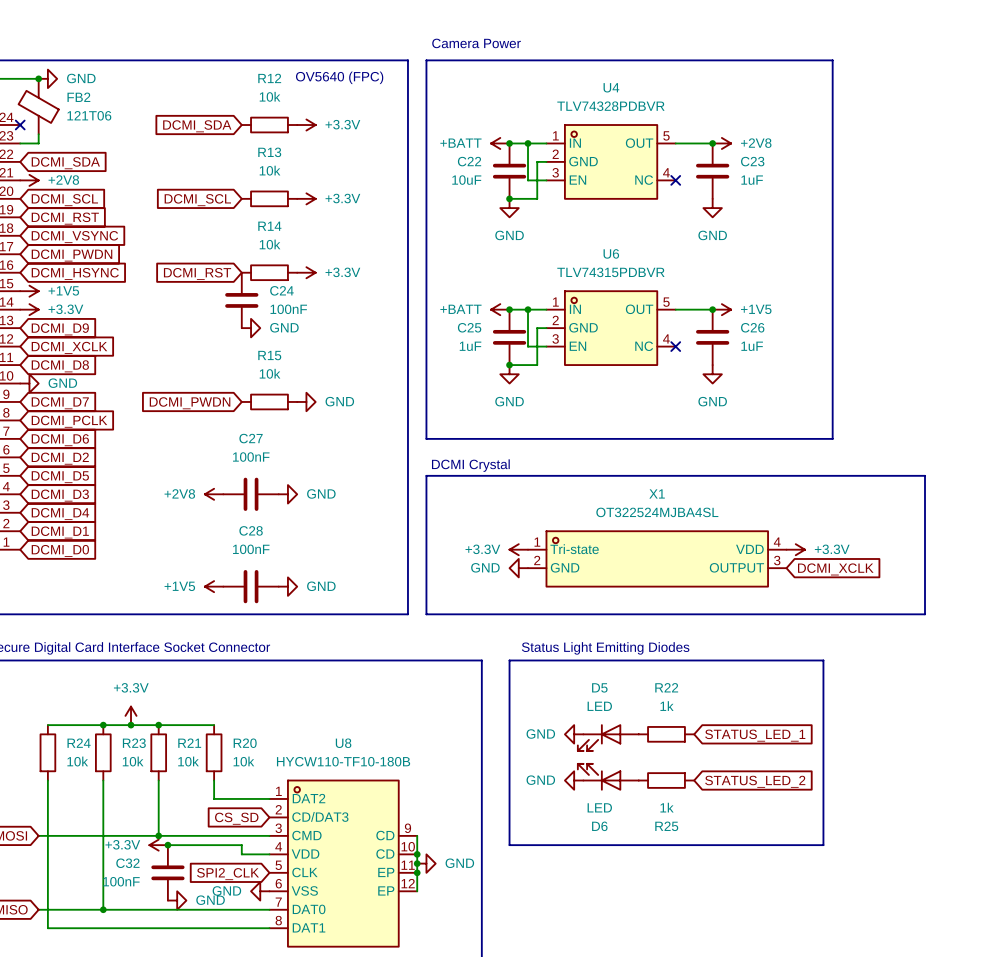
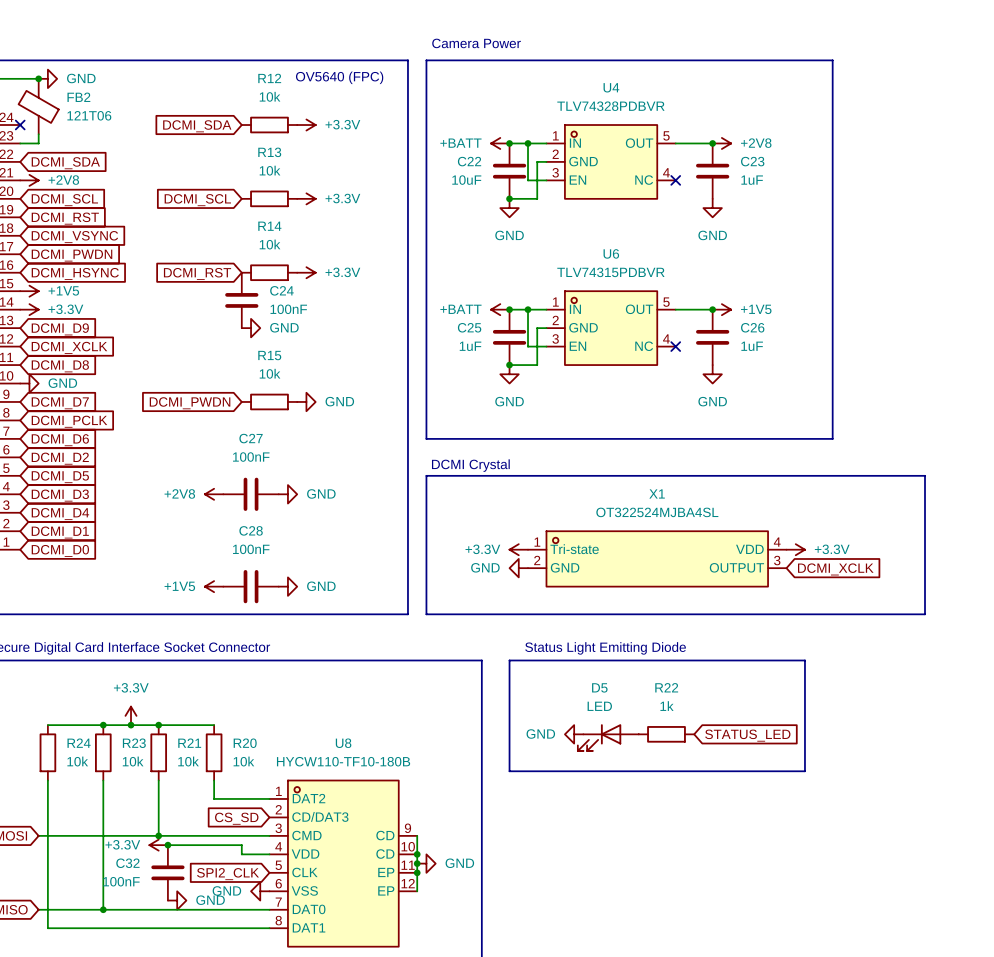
text: Status Light Emitting Diodes (605, 648) -> Status Light Emitting Diode (605, 648)
line: (804, 660) (823, 660) (823, 845) (509, 845) (509, 771) -> (804, 660) (804, 771) (509, 771)
global label: STATUS_LED_1 (755, 735) -> STATUS_LED (747, 735)
D6: LED (608, 777) -> none
power symbol: GND (574, 780) -> none
R25: 1k (666, 780) -> none
global label: STATUS_LED_2 (755, 781) -> none

